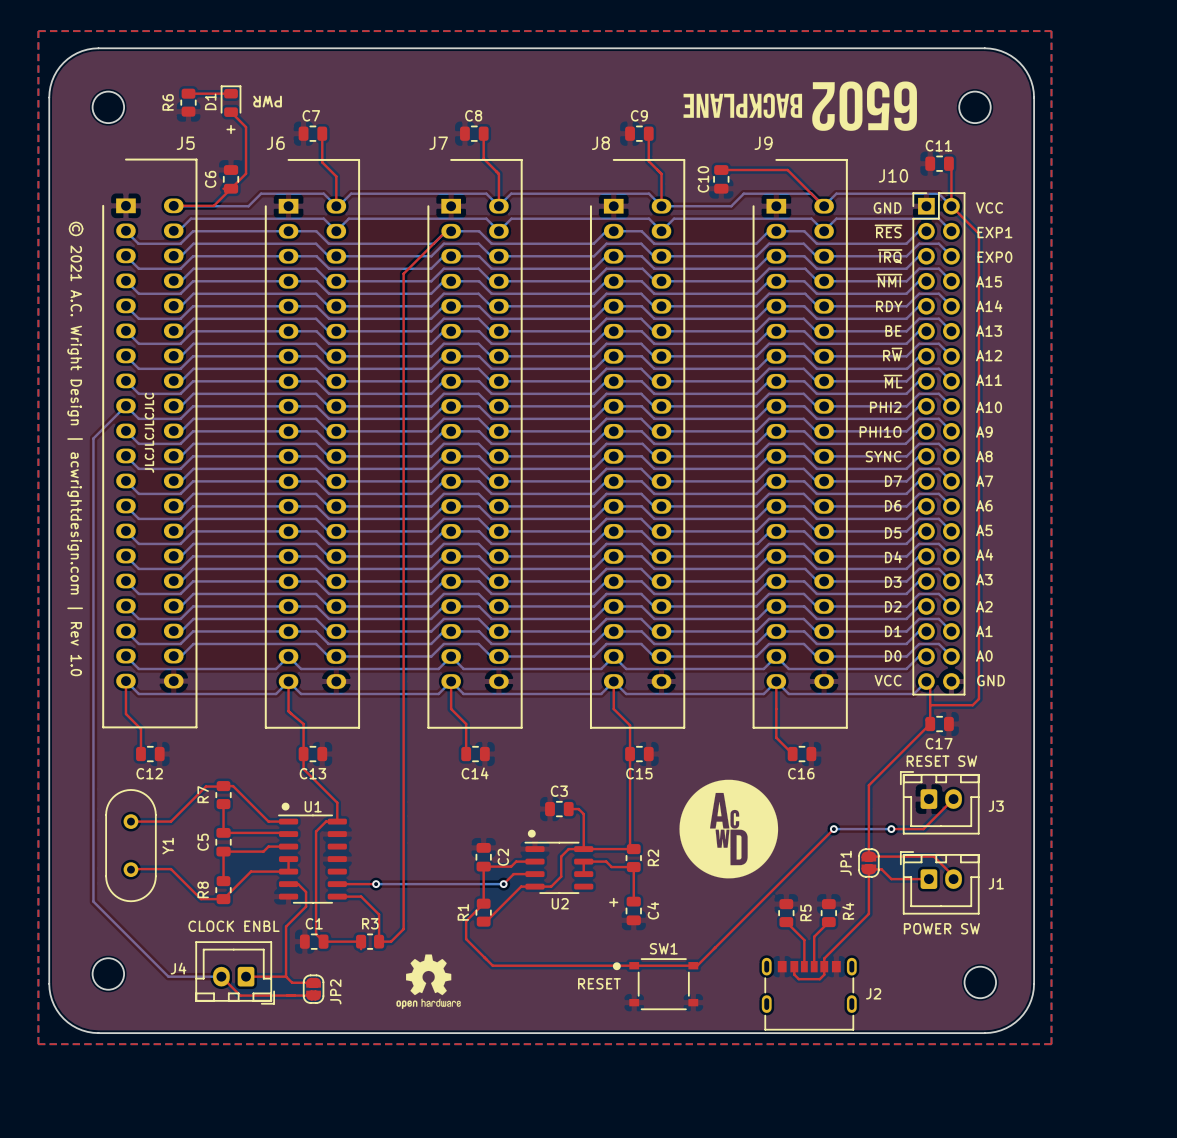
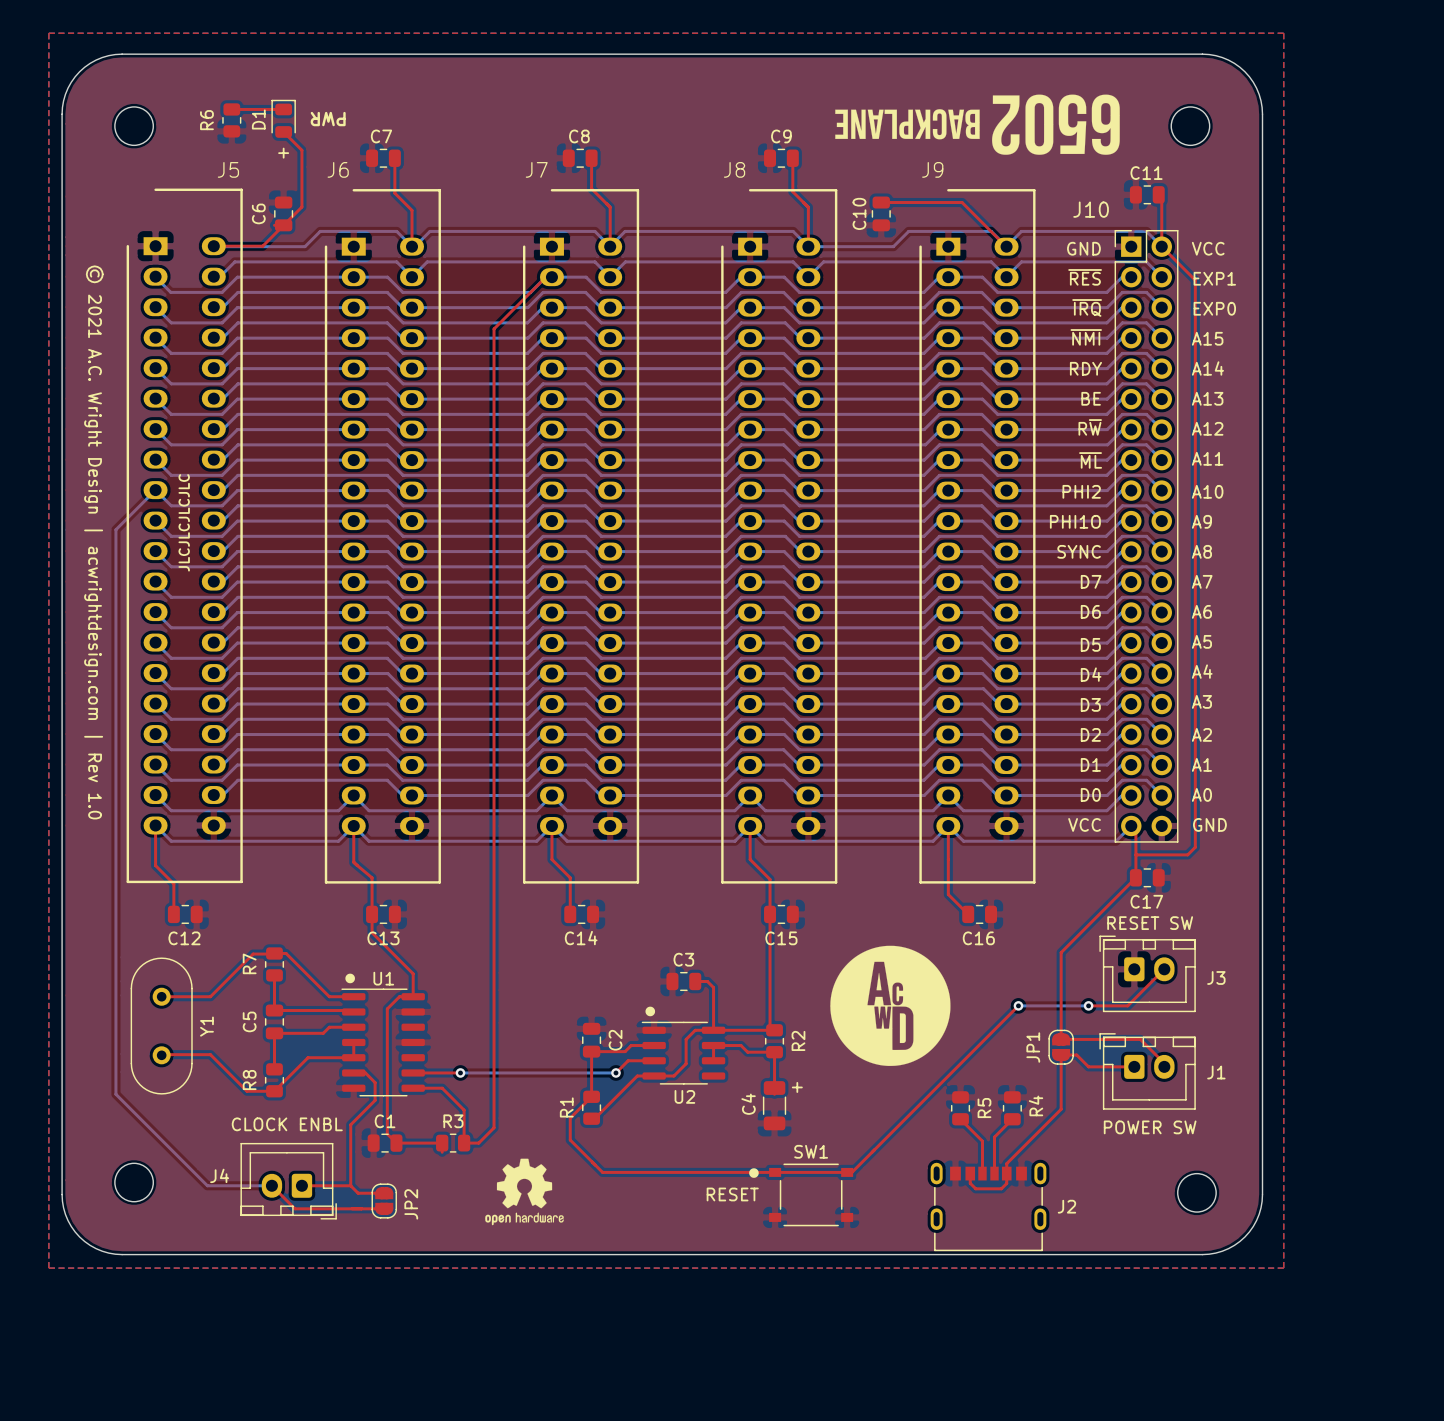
C4 footprint: [625, 896, 642, 926] -> [762, 1081, 787, 1131]
text position: + (613, 902) -> + (797, 1087)
C4 name position: C4 (653, 910) -> C4 (748, 1104)

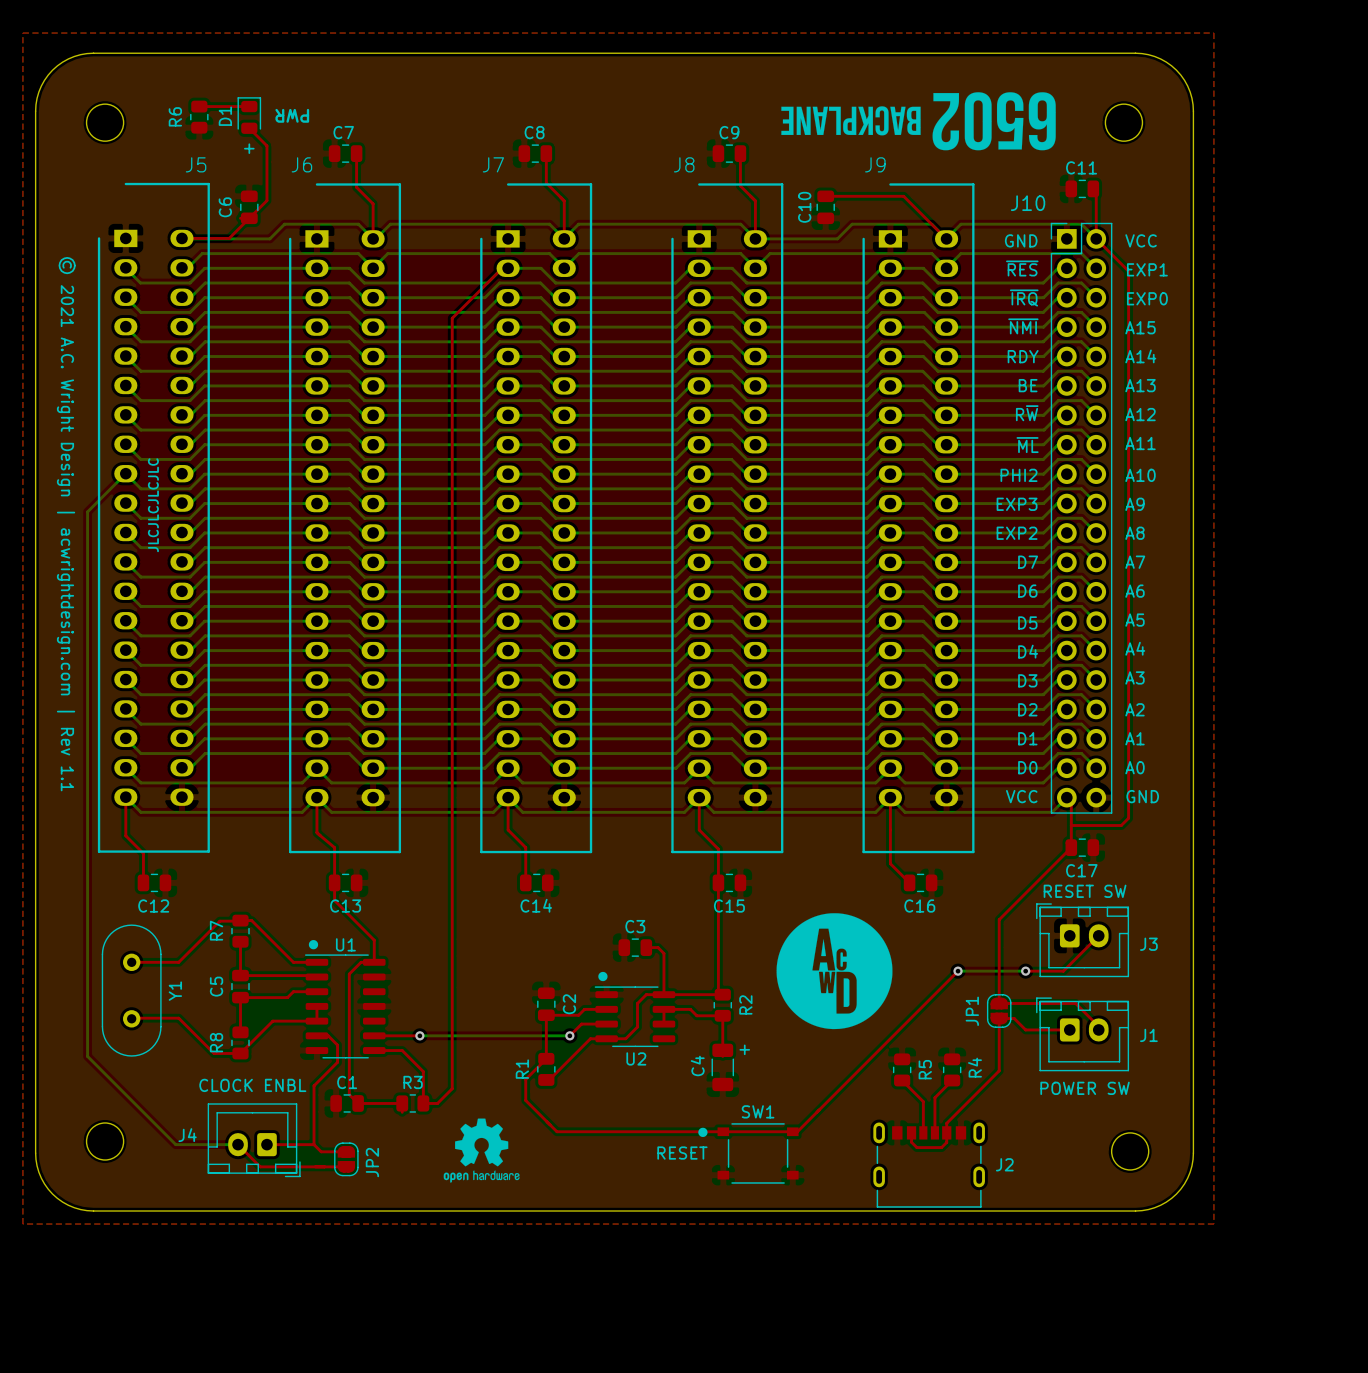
text: PHI1O (1075, 521) -> EXP3 (1017, 504)
text: © 2021 A.C. Wright Design | acwrightdesign.com | Rev 1.0 (93, 542) -> © 2021 A.C. Wright Design | acwrightdesign.com | Rev 1.1 (66, 524)
text: SYNC (1079, 551) -> EXP2 (1017, 533)

